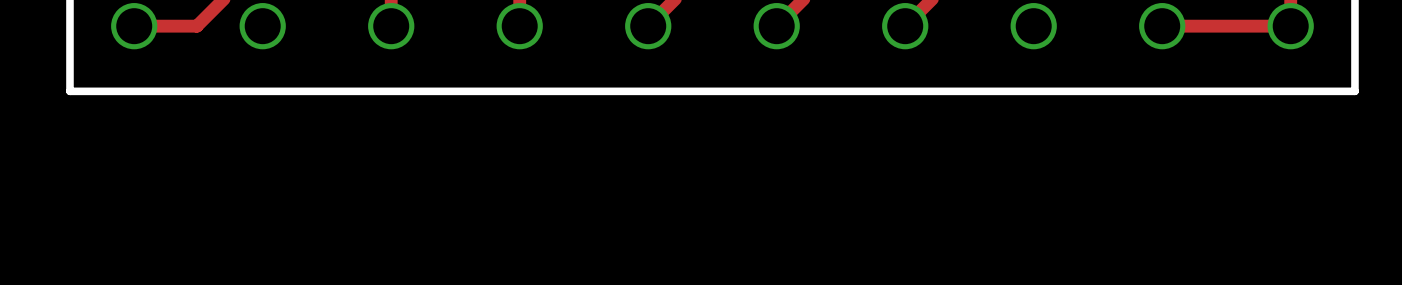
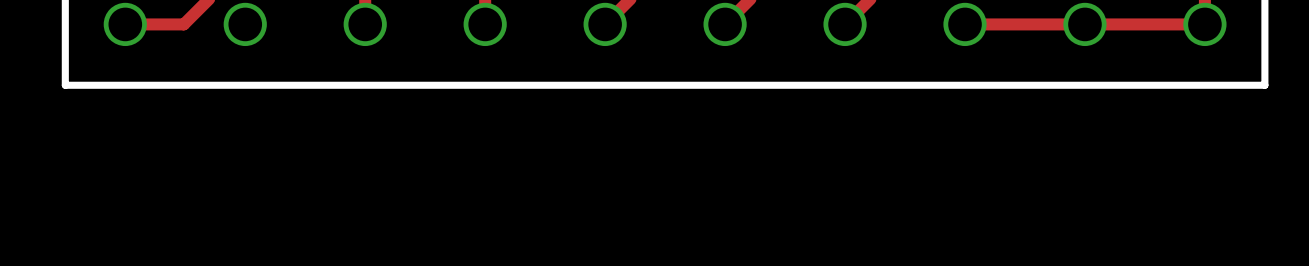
track: none -> (965, 24) (1084, 24)

